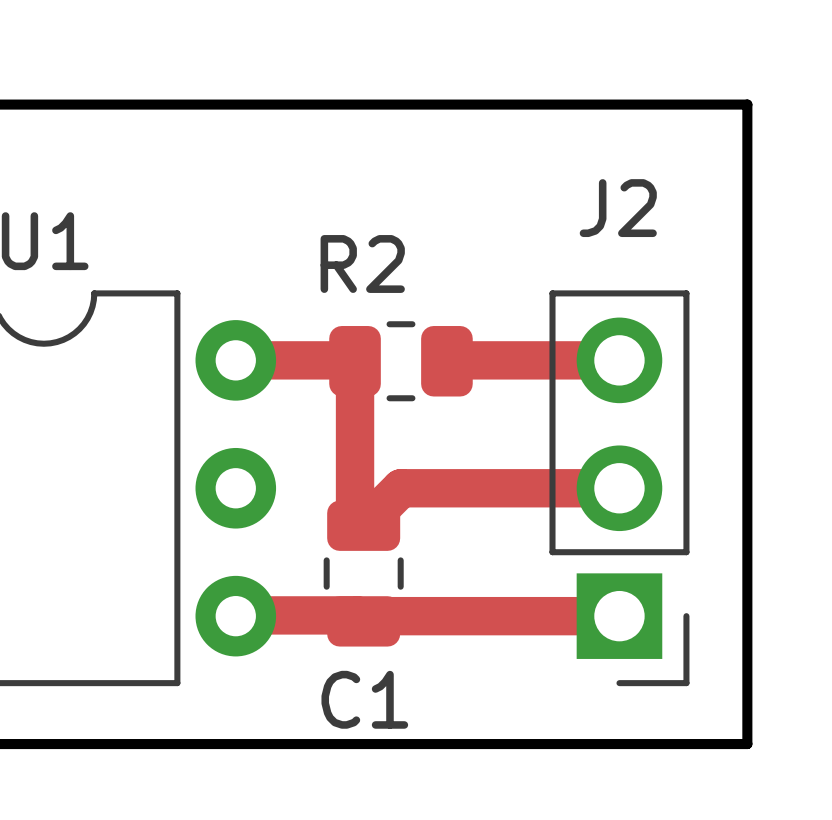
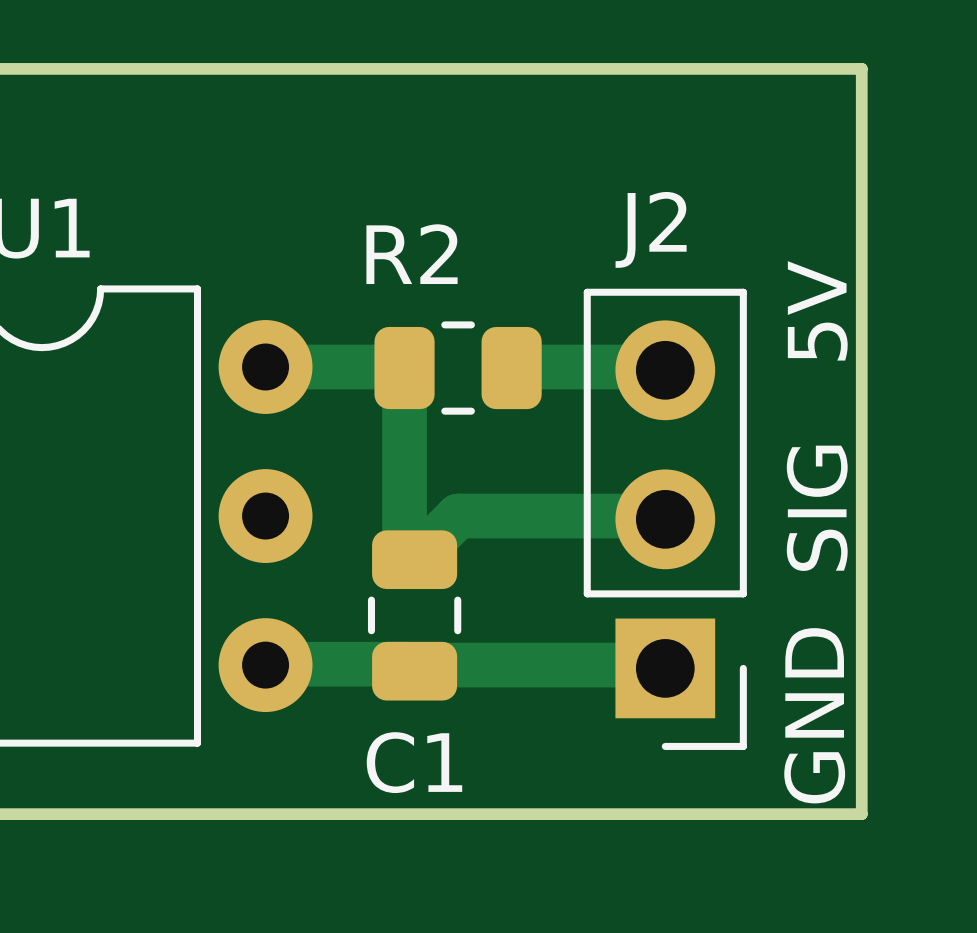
J2 name position: J2 (618, 208) -> J2 (651, 229)
text: none -> 5V (817, 310)
text: none -> SIG (817, 508)
J2 position: (619, 488) -> (665, 519)
text: none -> GND (814, 715)

